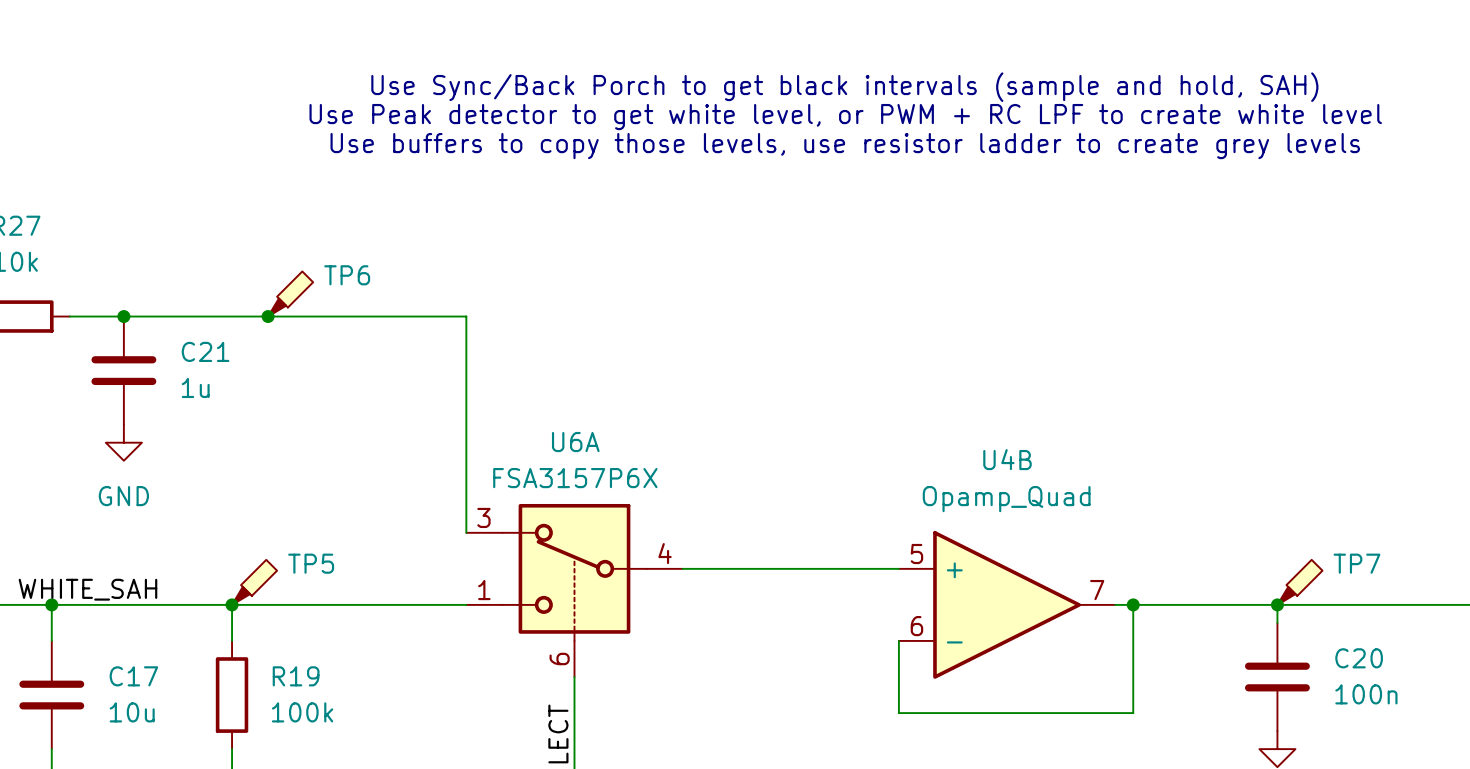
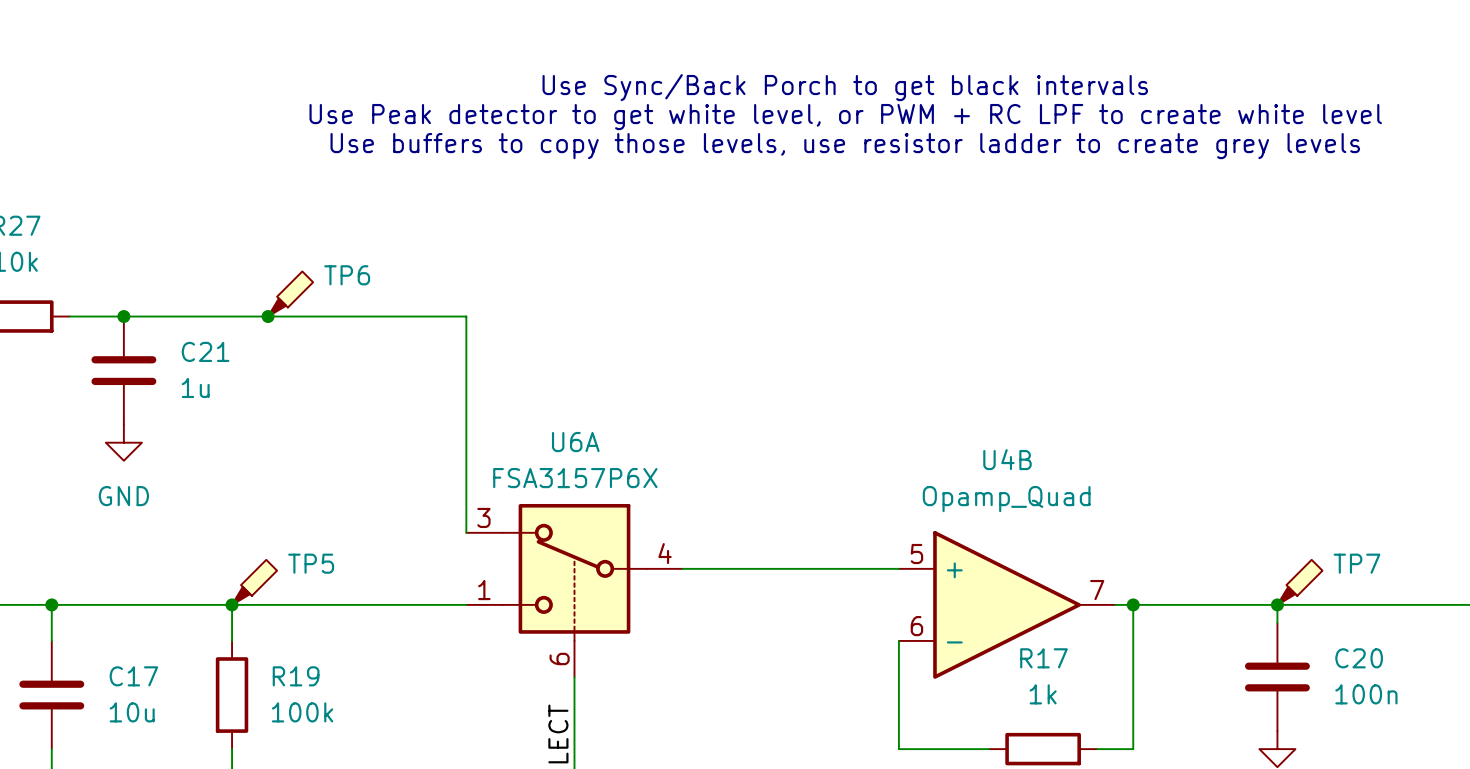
text: Use Sync/Back Porch to get black intervals (sample and hold, SAH) (844, 87) -> Use Sync/Back Porch to get black intervals (845, 87)
label: WHITE_SAH (87, 589) -> none
wire: (898, 713) (1133, 713) -> (898, 713) (898, 749) (989, 749)
wire: none -> (1133, 713) (1133, 749) (1097, 749)
R17: none -> 1k (1043, 749)

